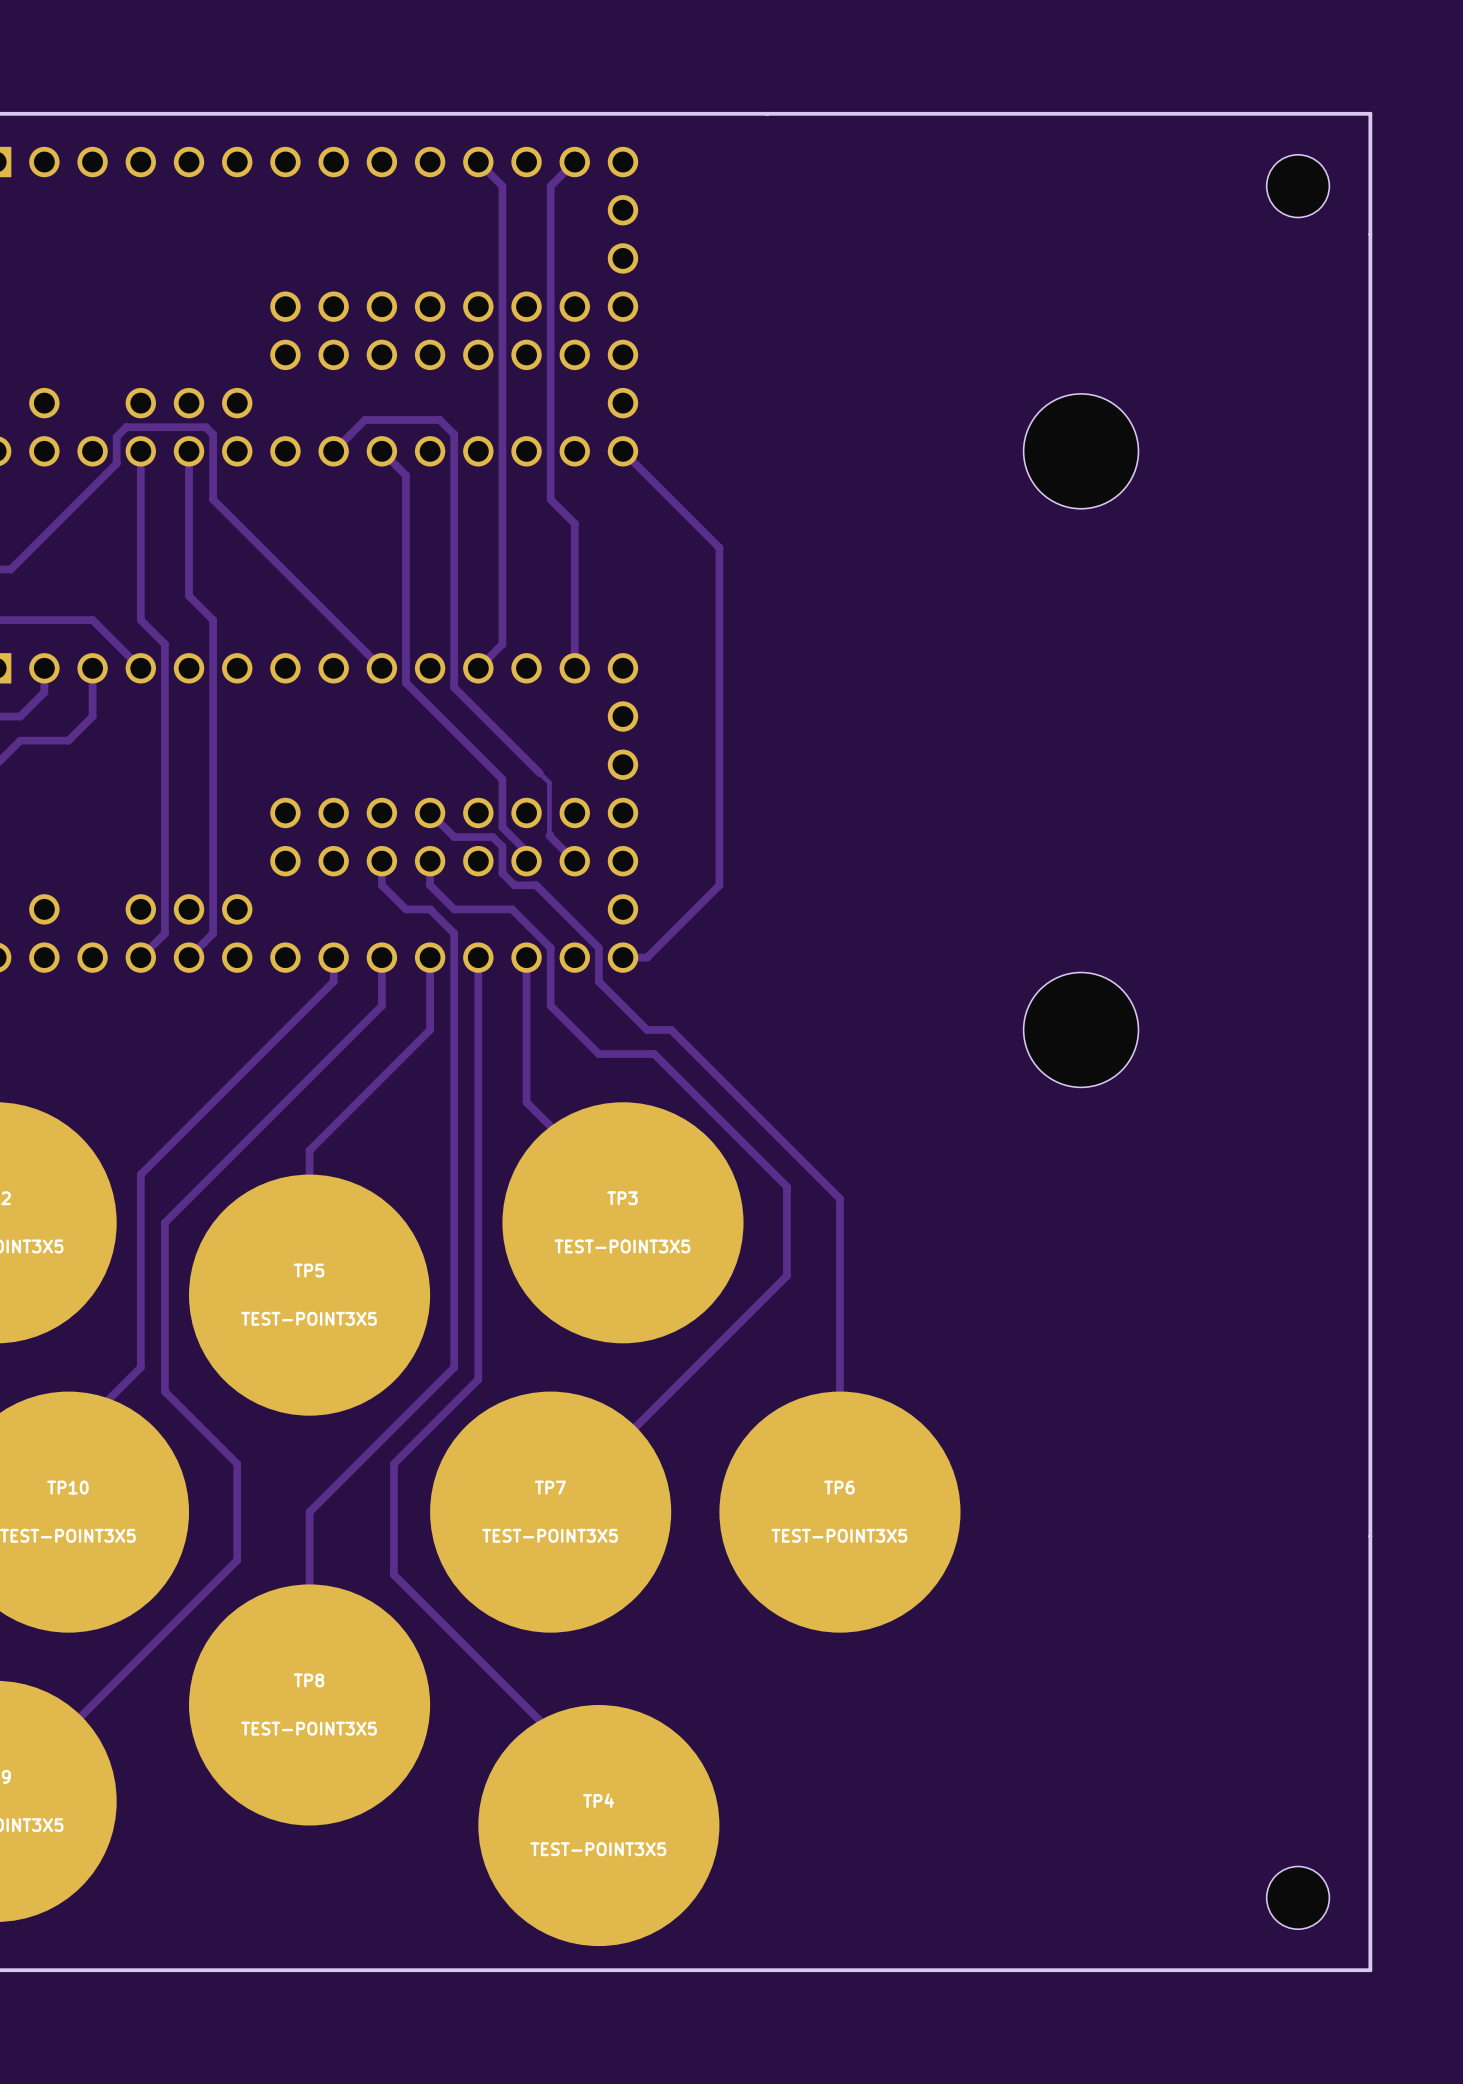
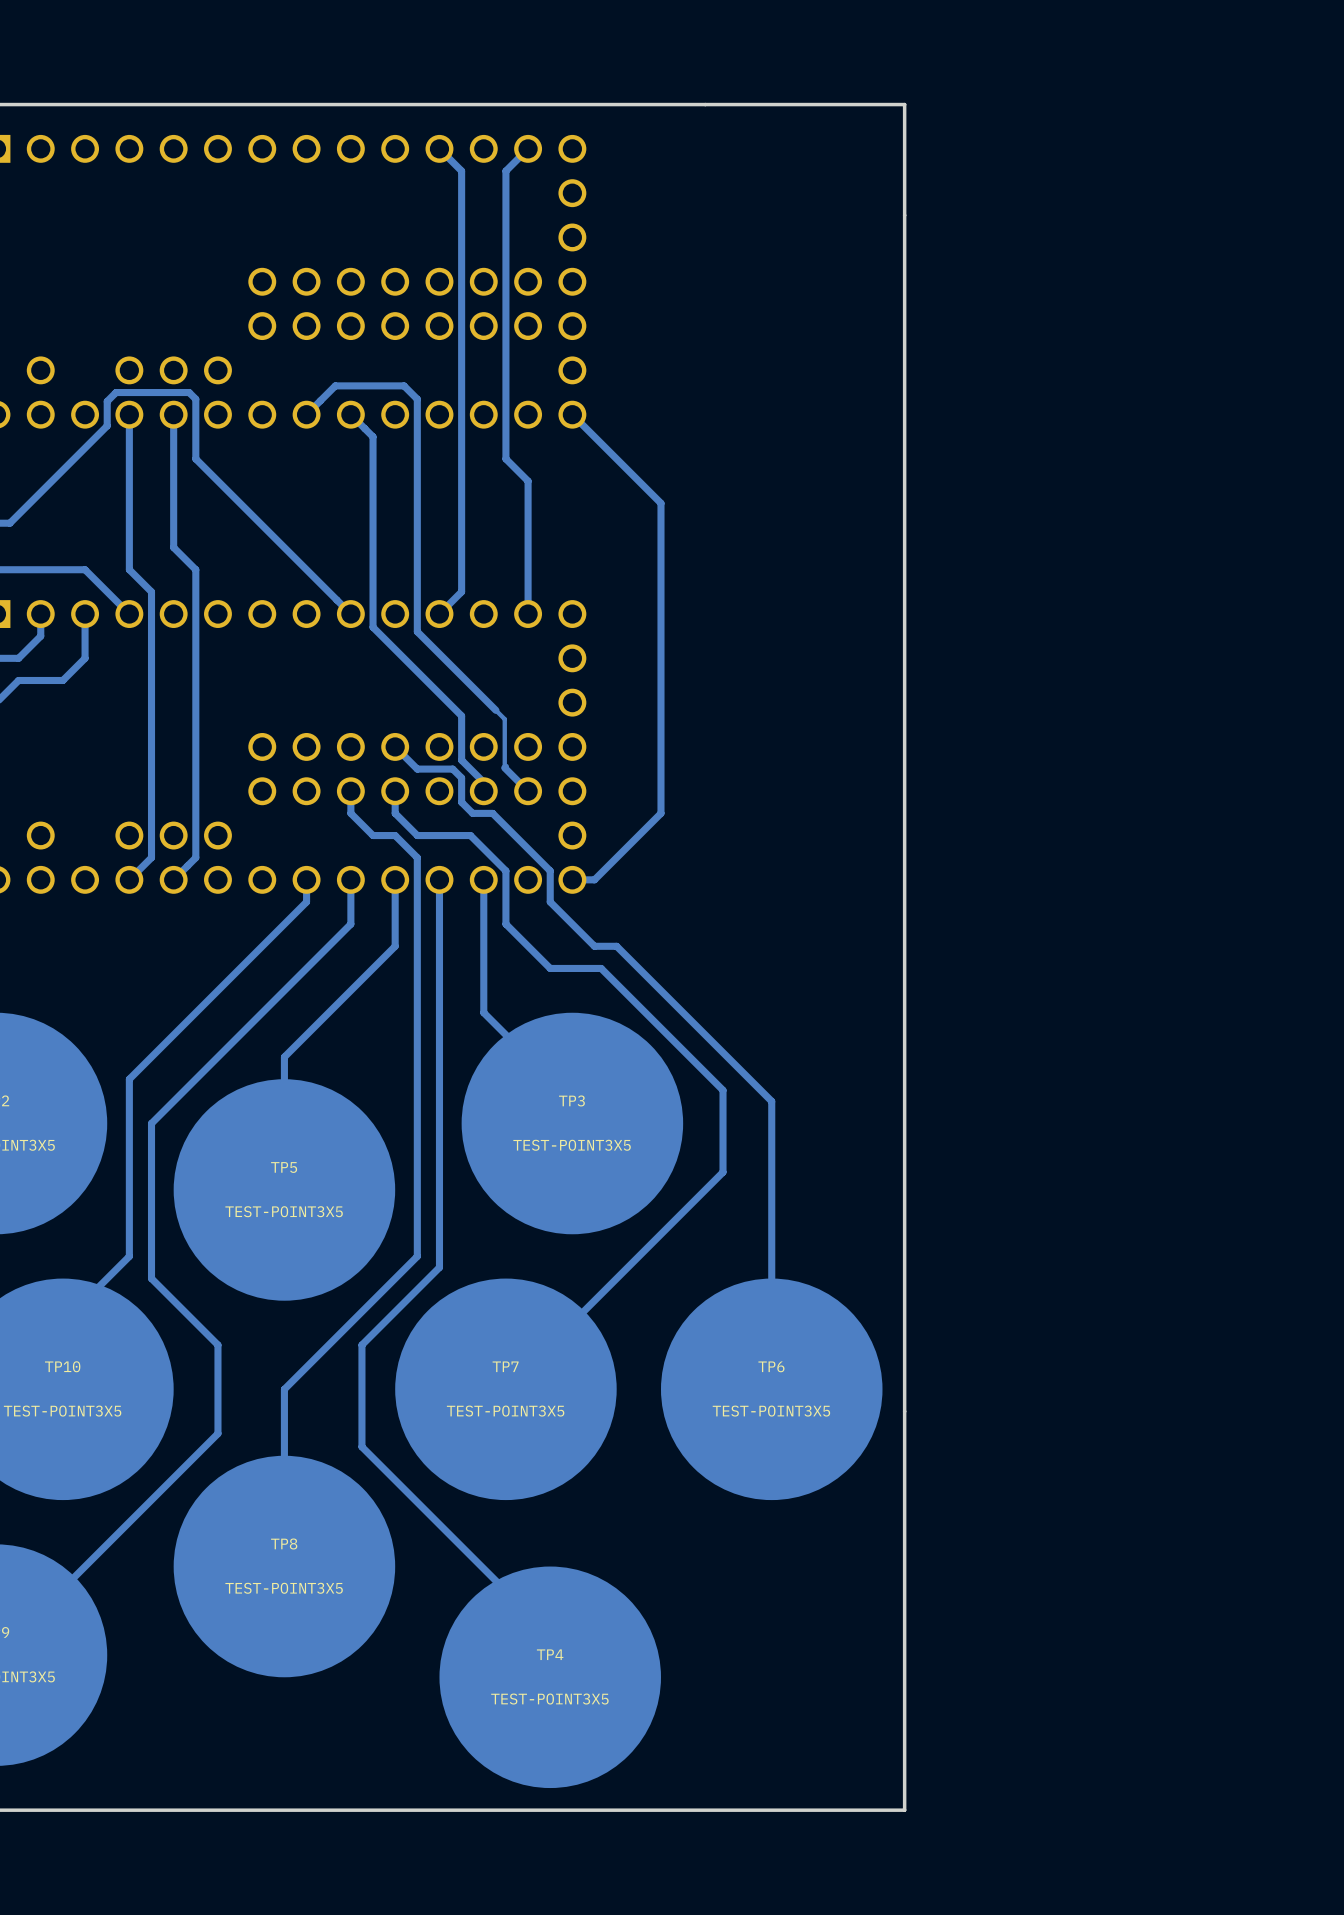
board edge: (984, 113) (1370, 113) (1370, 1970) (984, 1970) -> (904, 104) (904, 1810)
part: (1298, 186) -> none
part: (1081, 451) -> none
part: (1081, 1029) -> none
part: (1298, 1897) -> none

